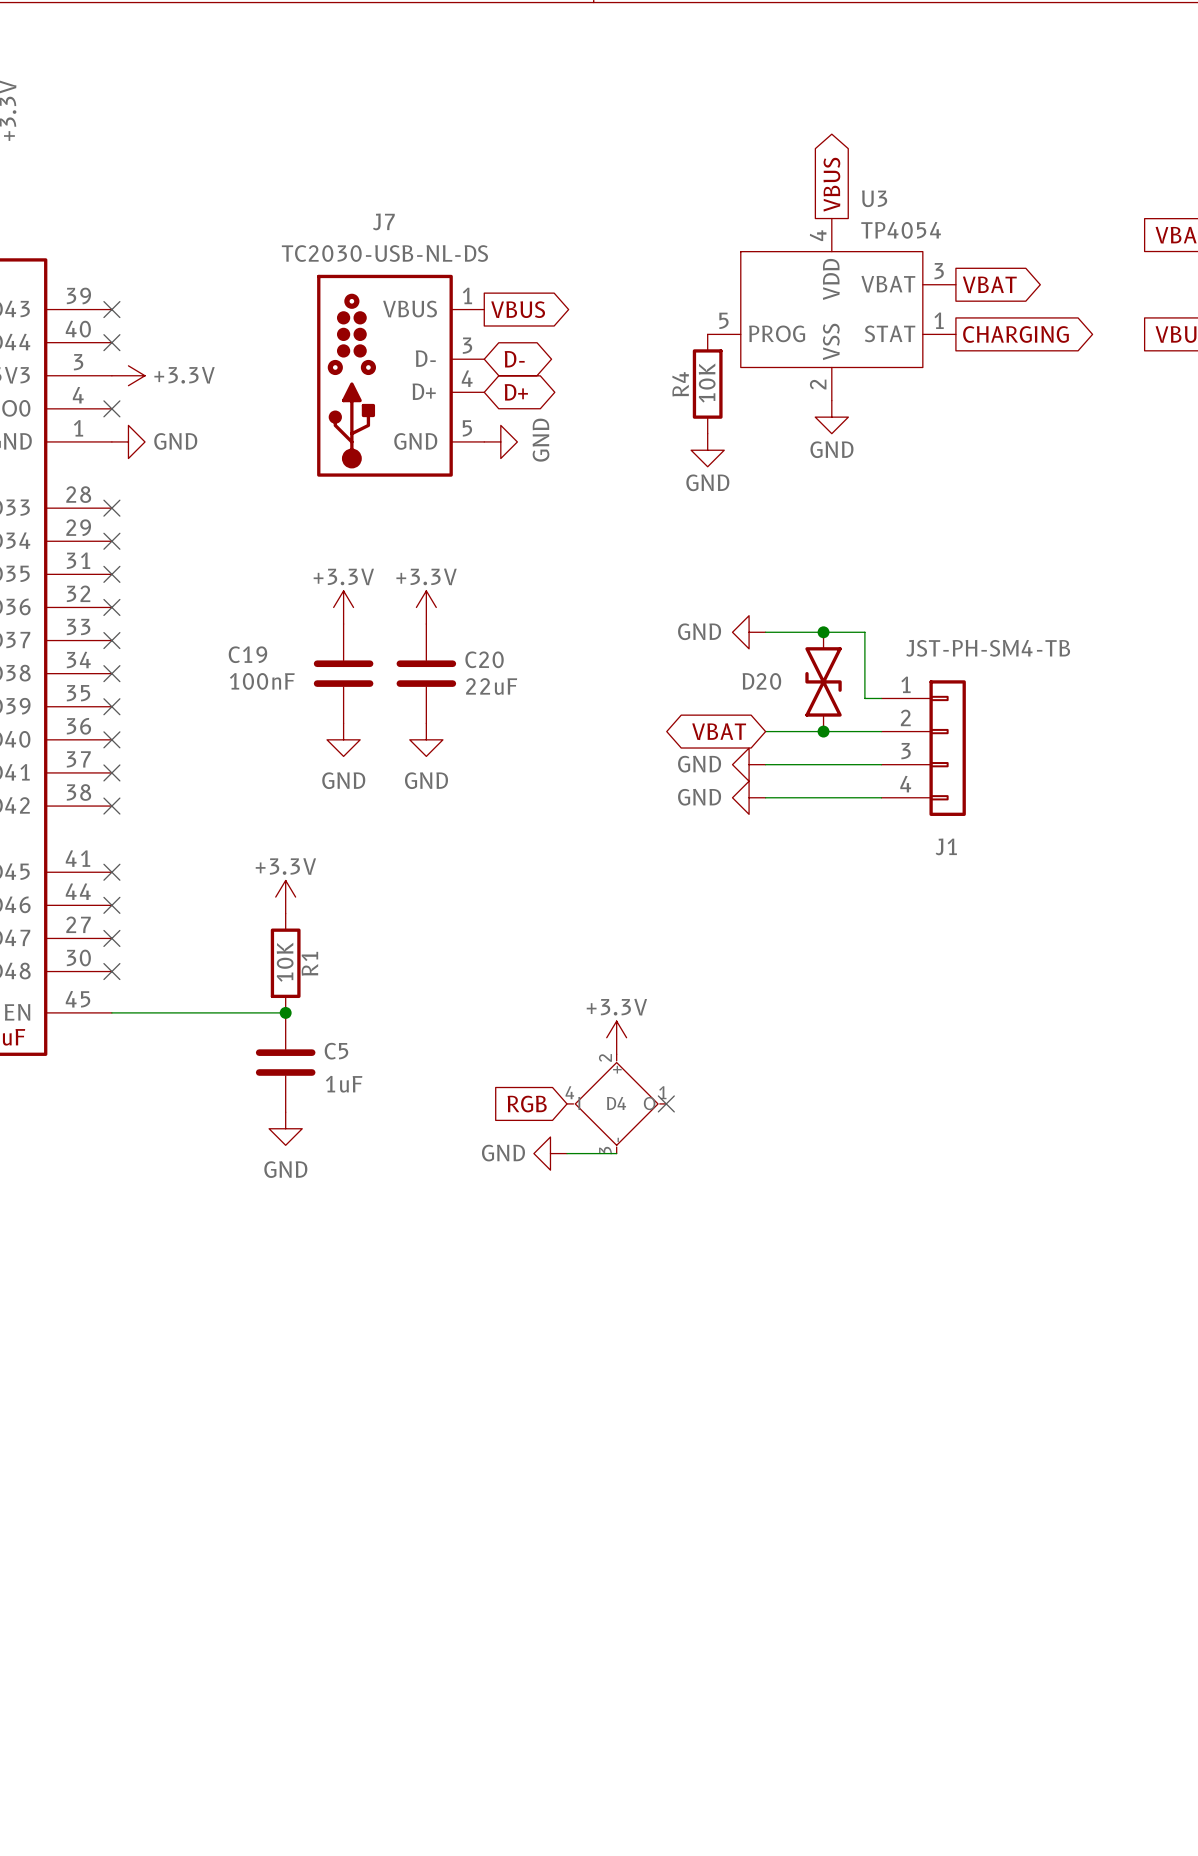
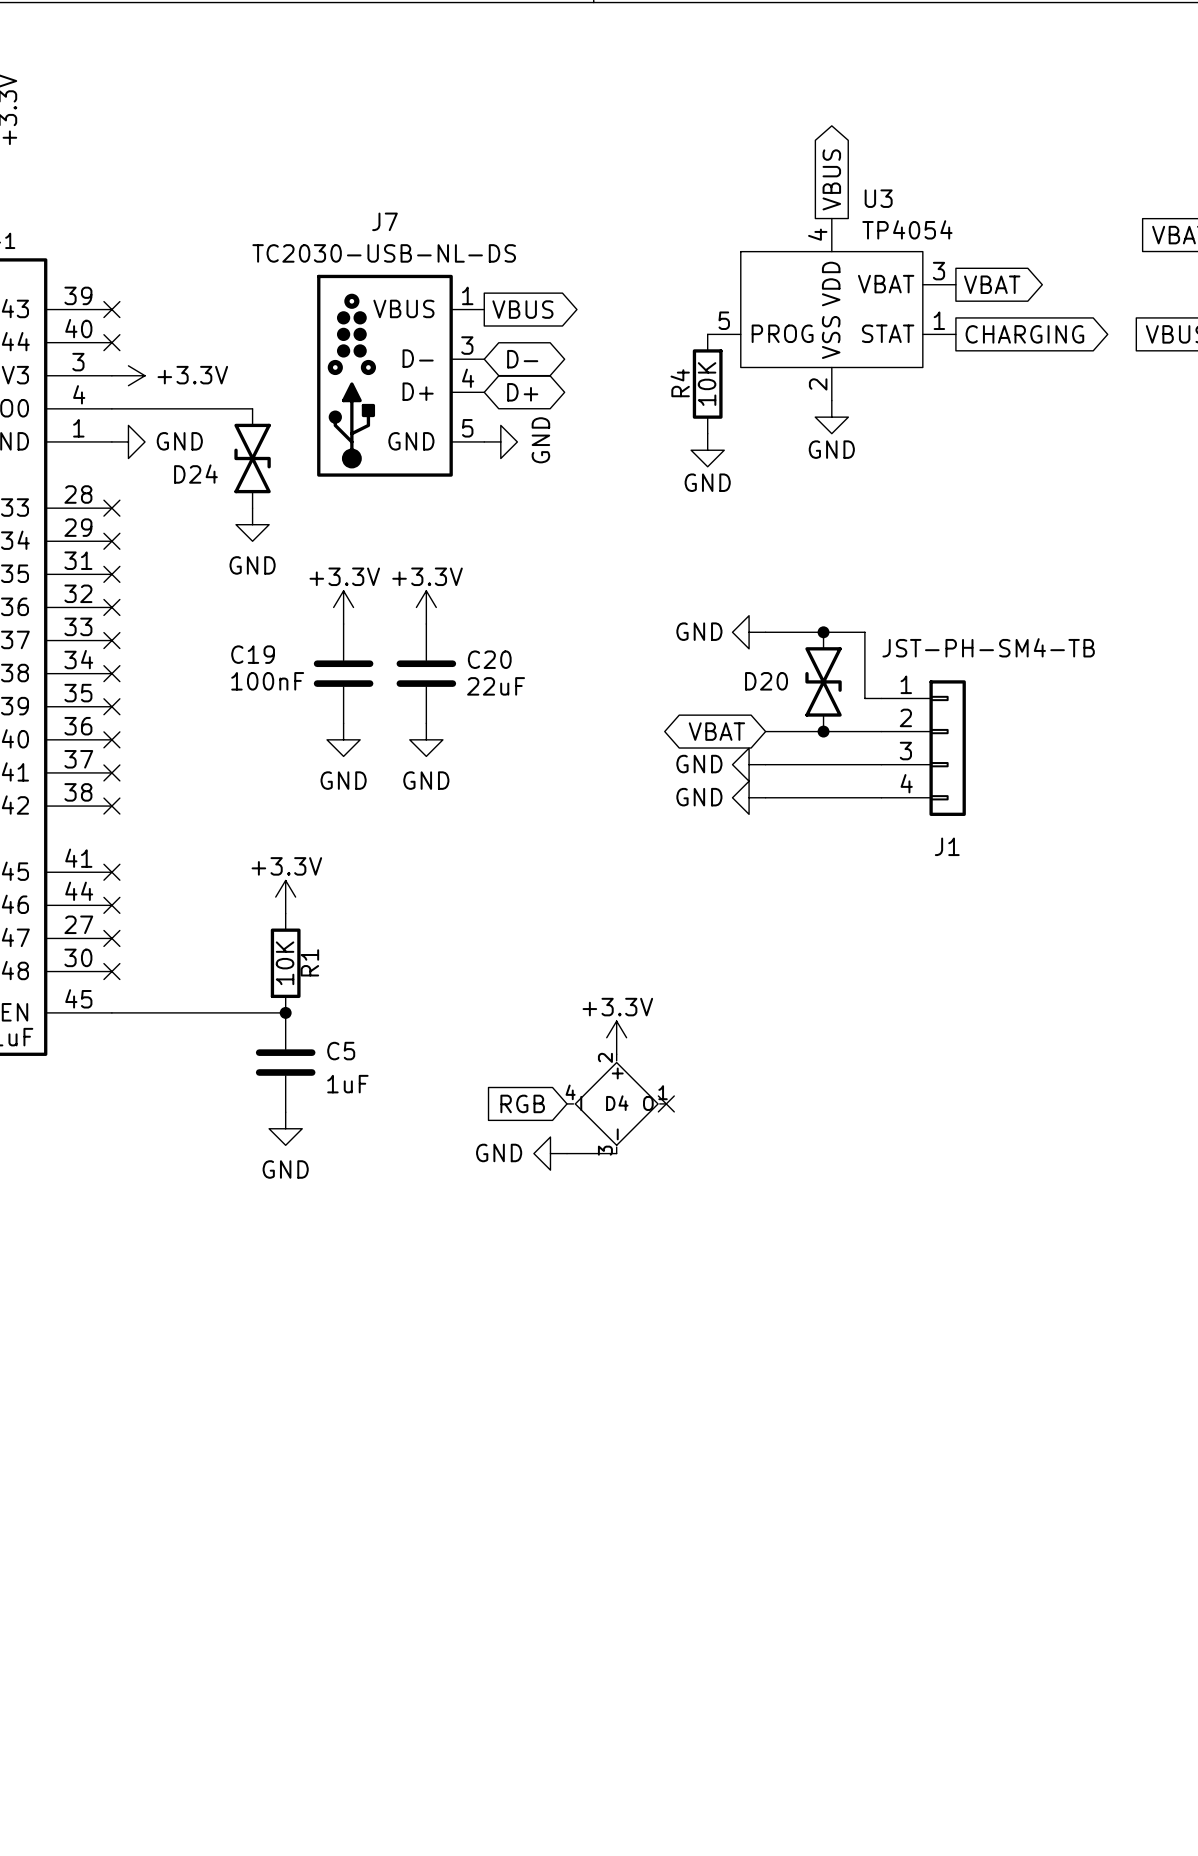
wire: none -> (111, 408) (252, 408)
no-connect mark: (111, 408) -> none
D24: none -> (252, 458)
power symbol: none -> GND (252, 524)

